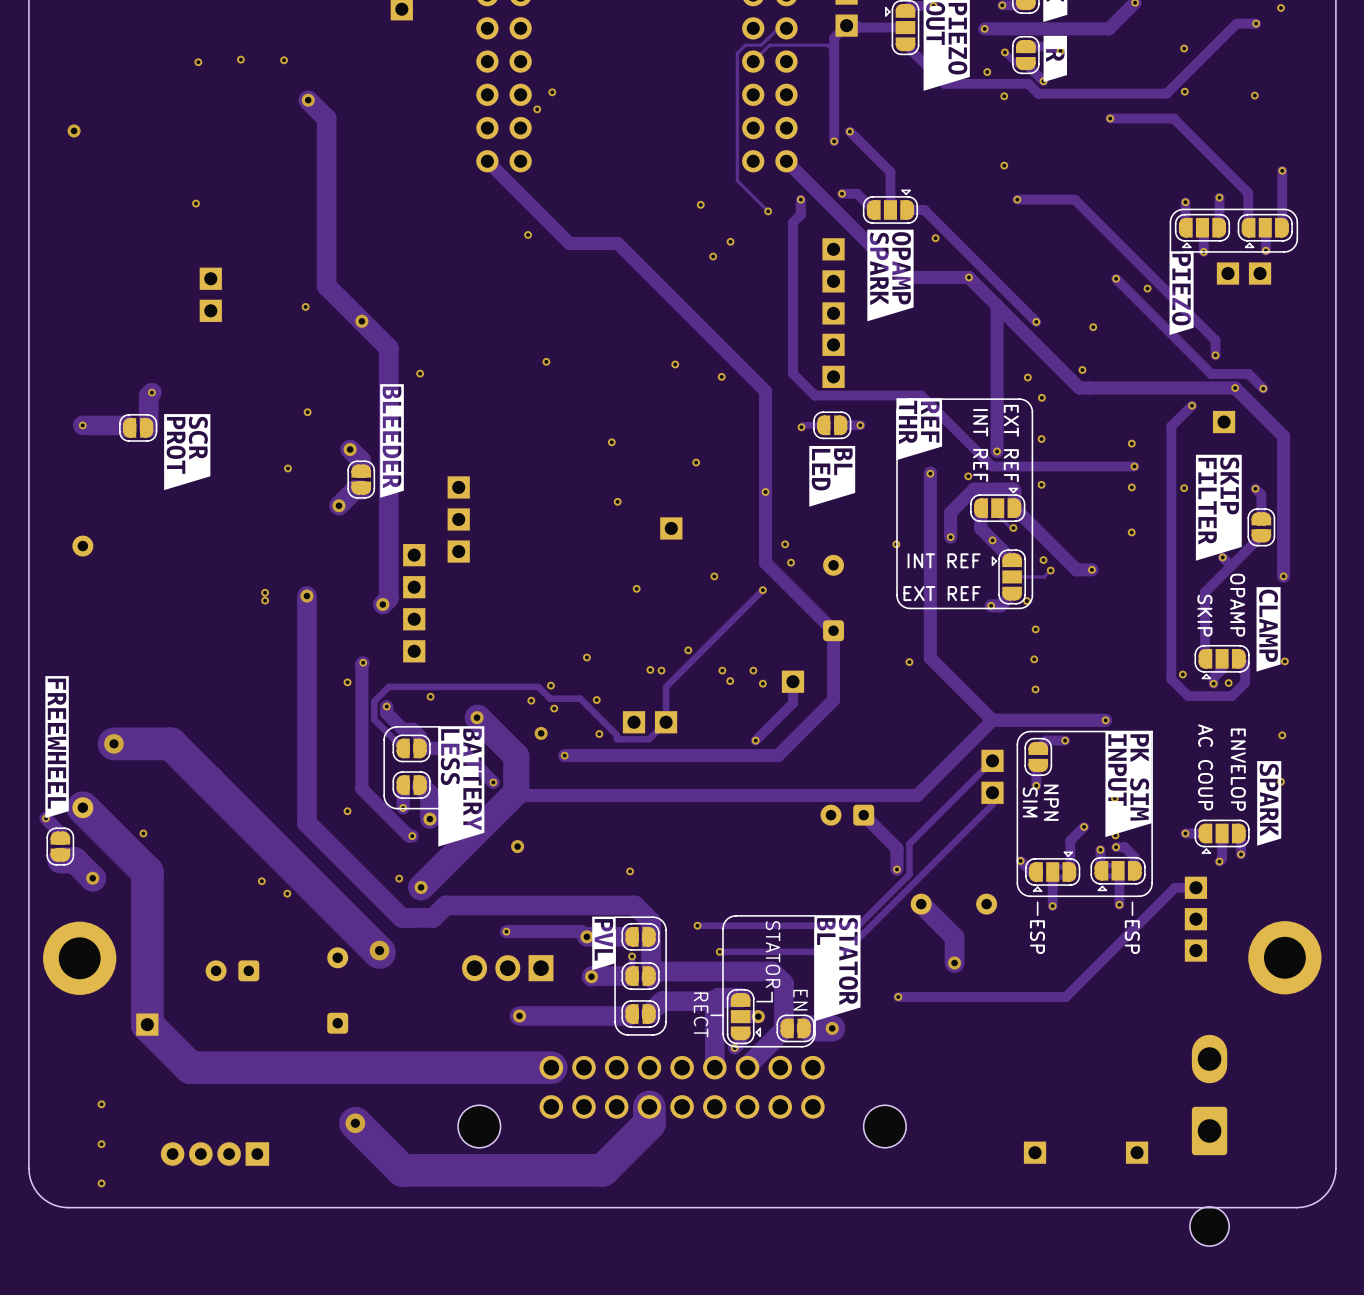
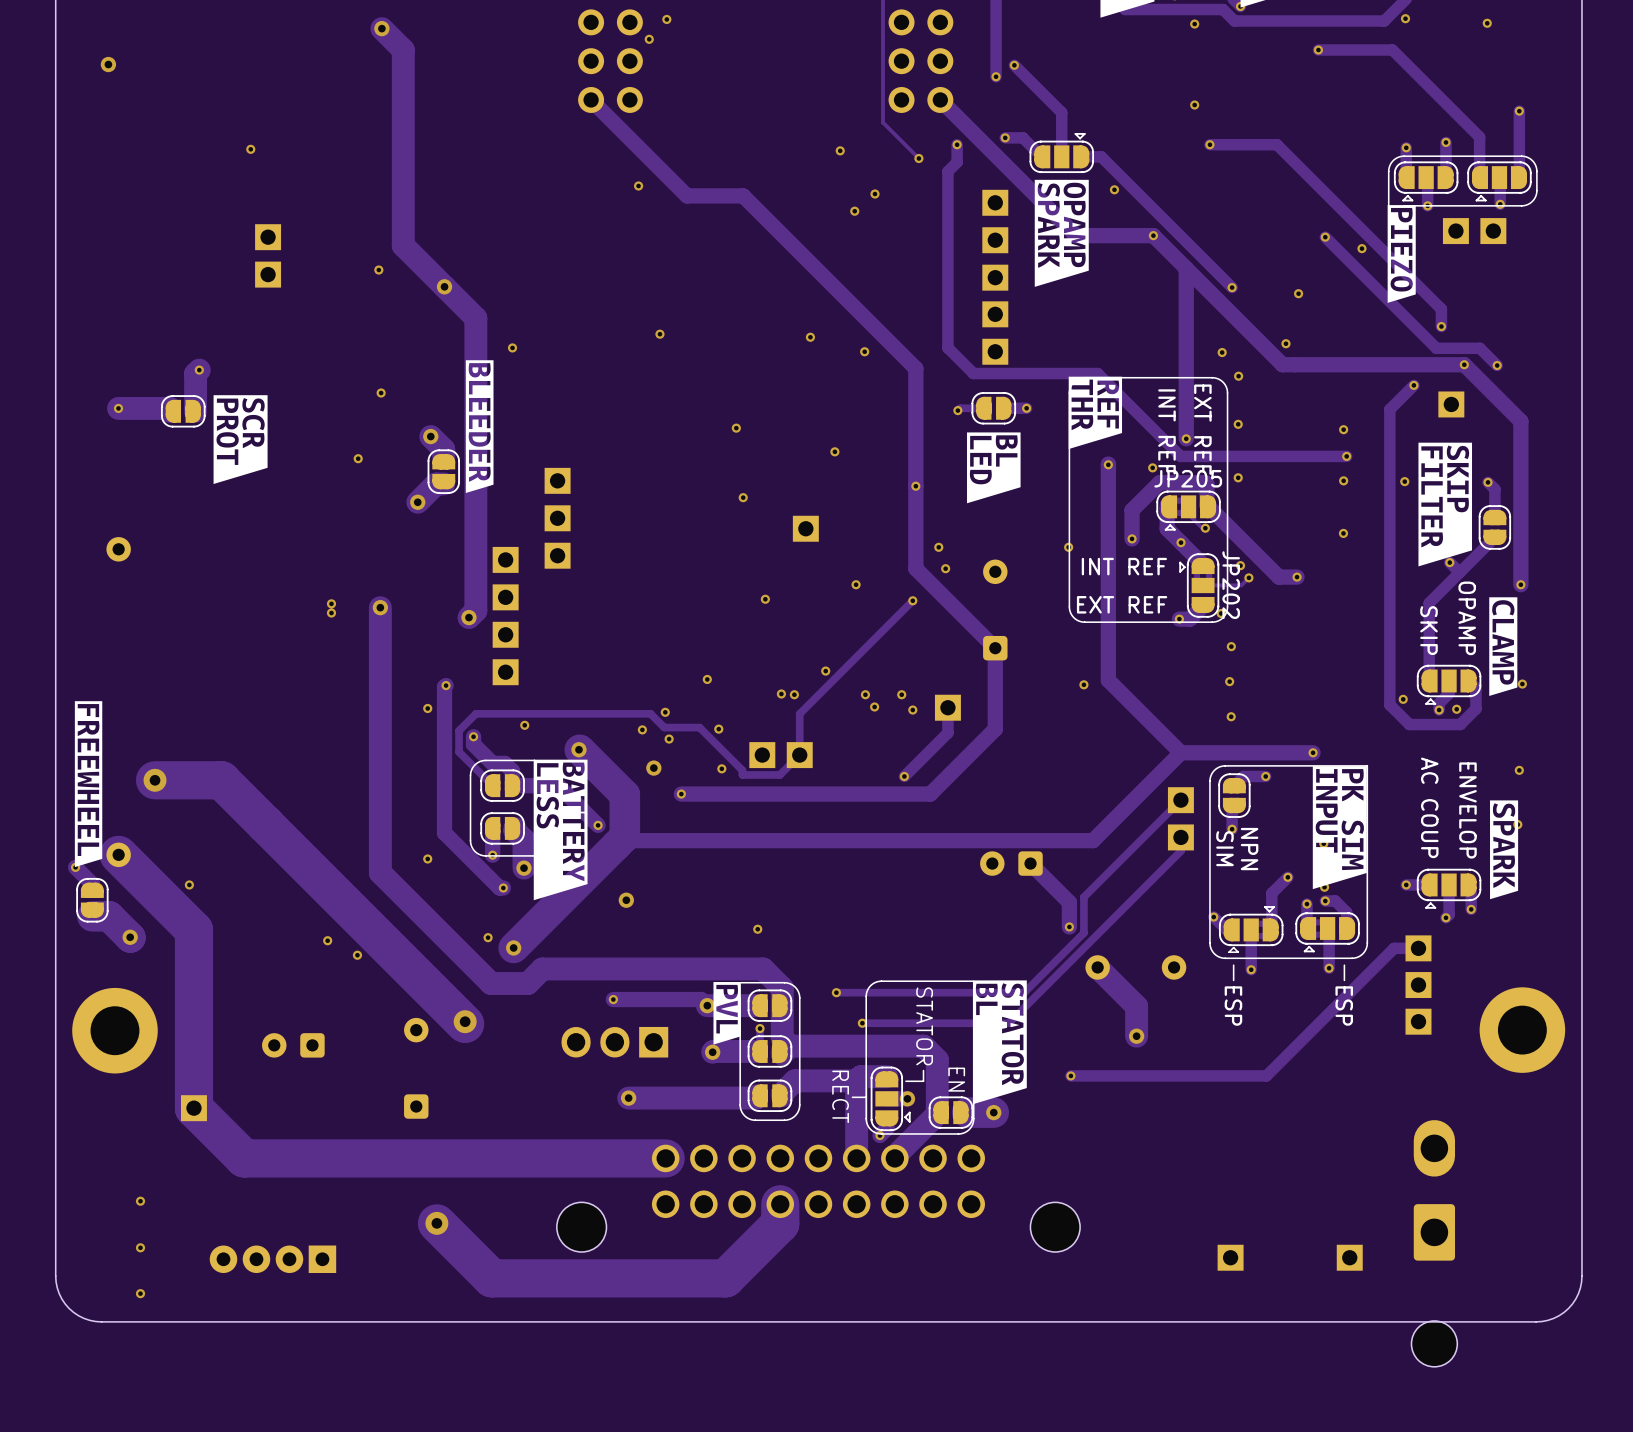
part: (997, 504) -> none
JP205: none -> (1188, 510)
part: (1008, 576) -> none
JP202: none -> (1199, 585)

